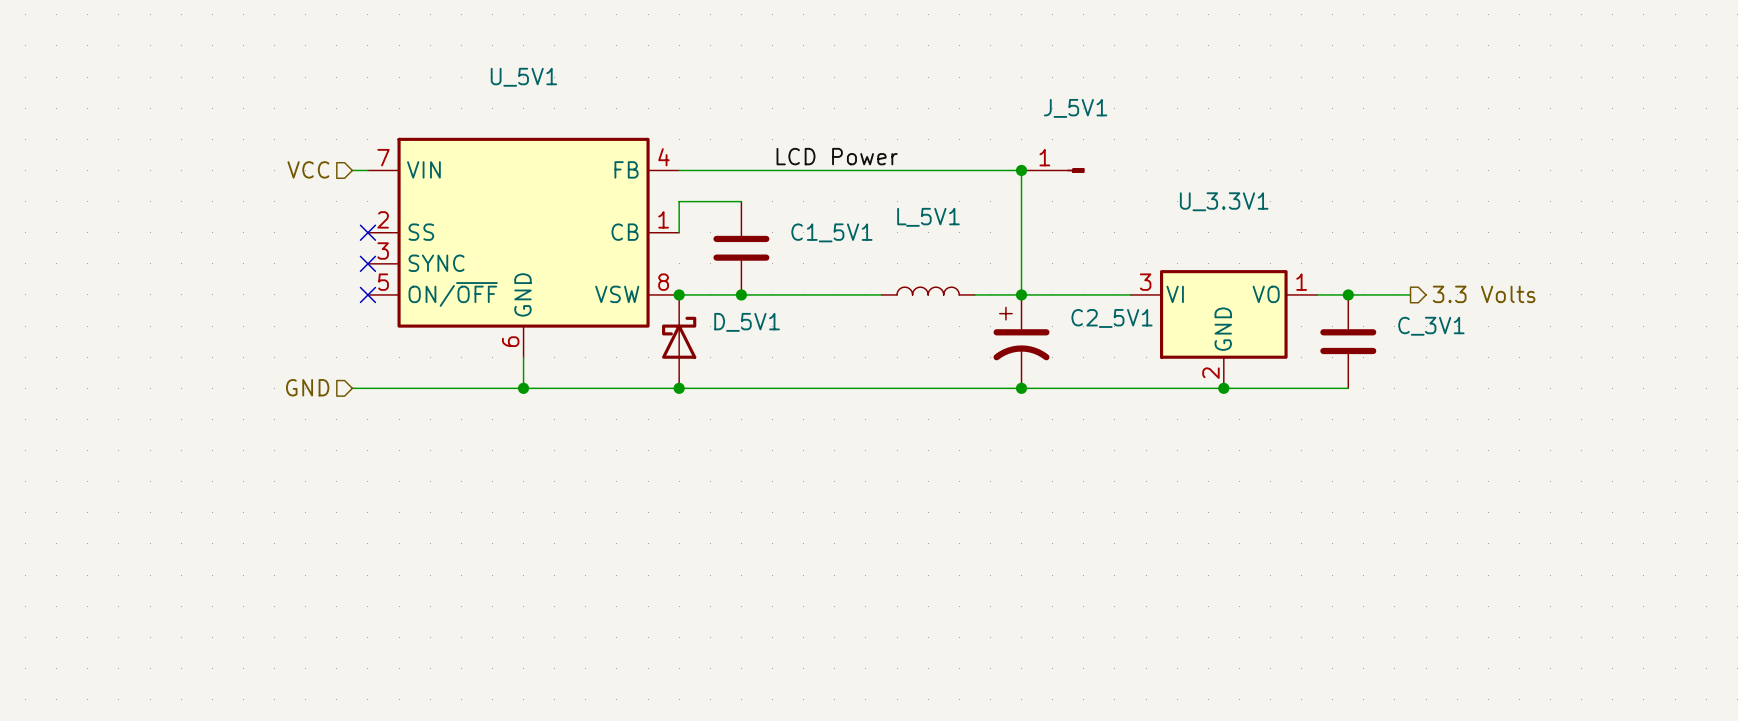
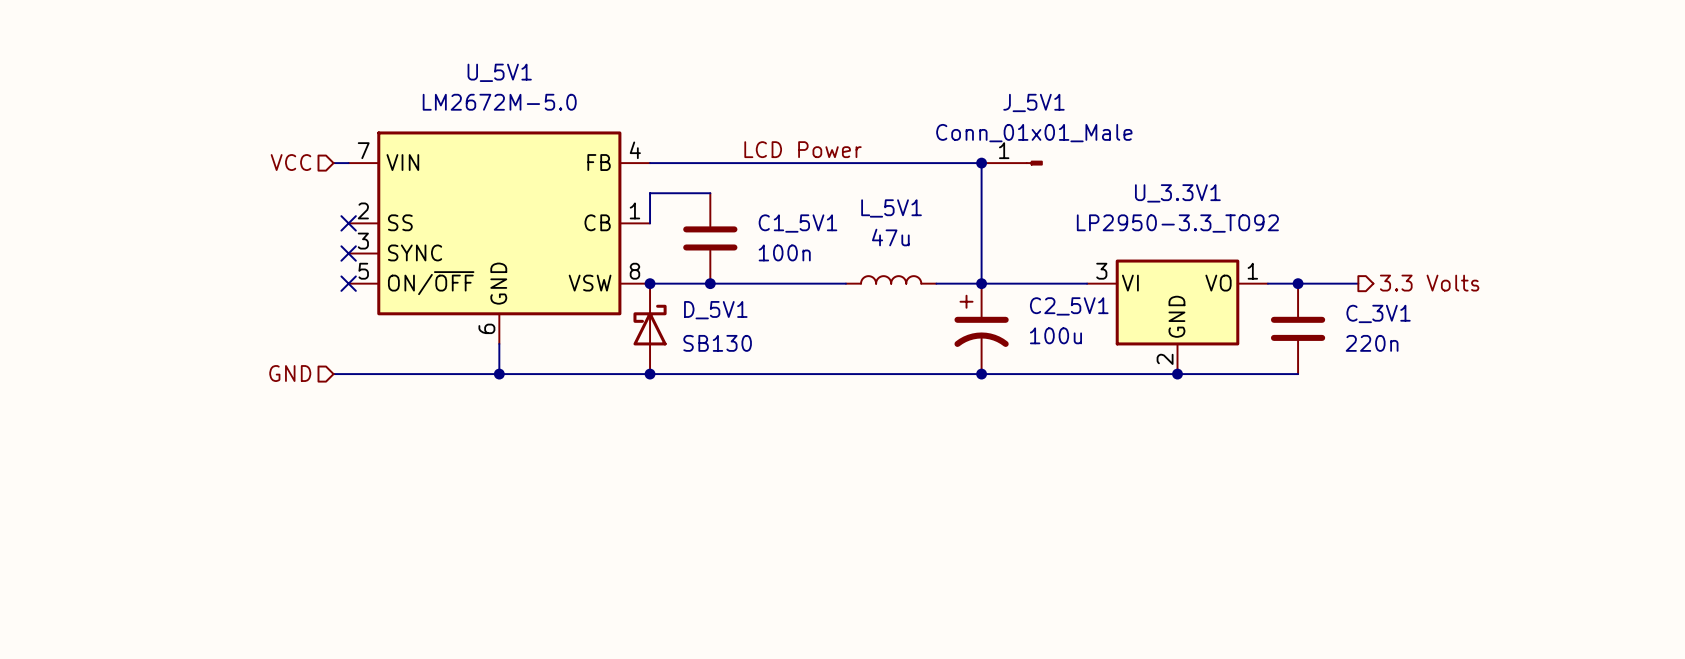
U_5V1 value: none -> LM2672M-5.0 (499, 102)
J_5V1 value: none -> Conn_01x01_Male (1034, 133)
U_3.3V1 value: none -> LP2950-3.3_TO92 (1177, 223)
L_5V1 value: none -> 47u (890, 237)
C1_5V1 value: none -> 100n (784, 252)
C2_5V1 value: none -> 100u (1055, 335)
D_5V1 value: none -> SB130 (717, 343)
C_3V1 value: none -> 220n (1372, 343)

